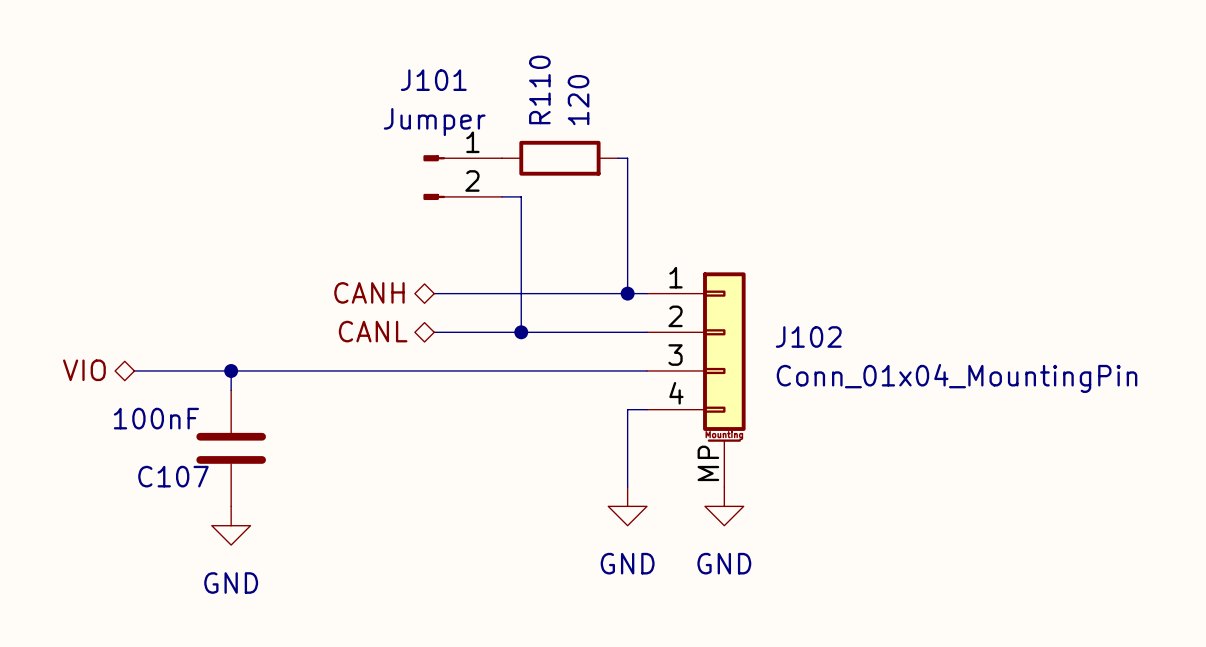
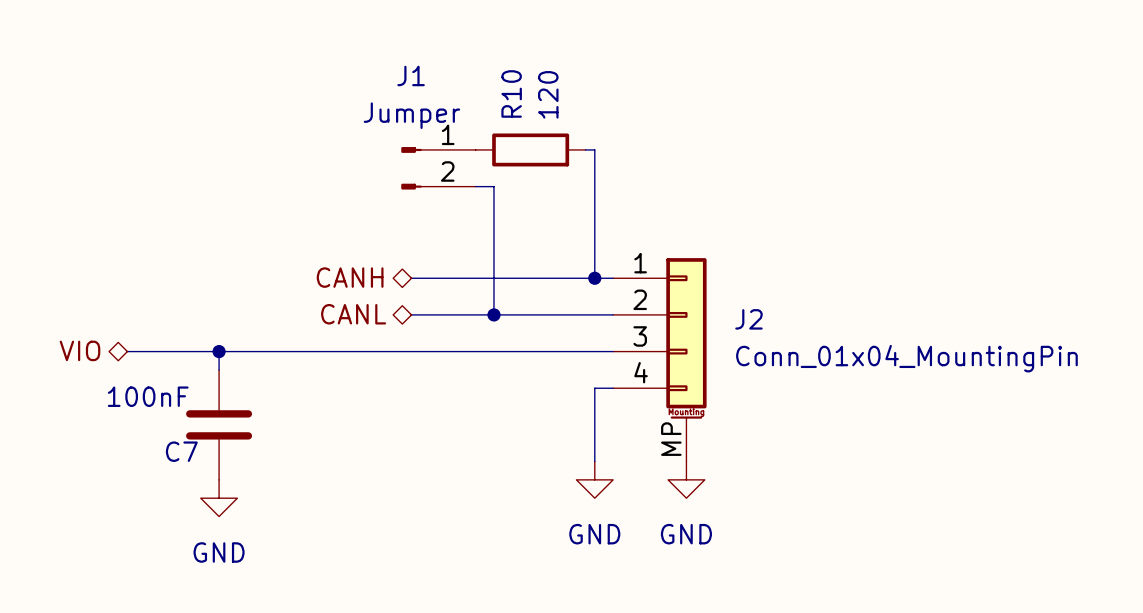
J101 name: J101 (433, 80) -> J1 (411, 75)
R110 name: R110 (539, 89) -> R10 (511, 93)
J102 name: J102 (808, 337) -> J2 (748, 319)
C107 name: C107 (173, 476) -> C7 (181, 451)

